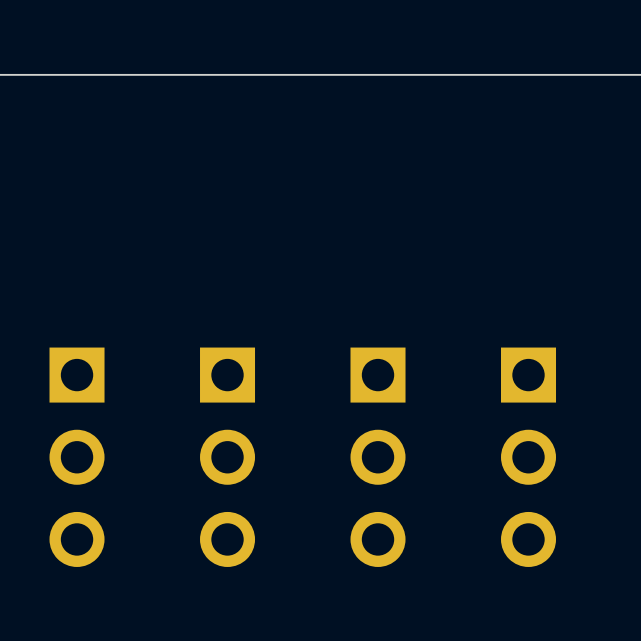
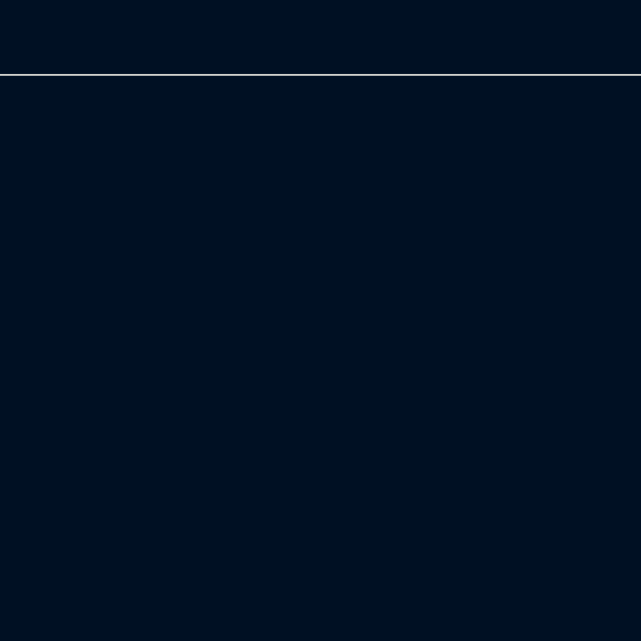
part: (77, 457) -> none
part: (227, 457) -> none
part: (378, 457) -> none
part: (528, 457) -> none

